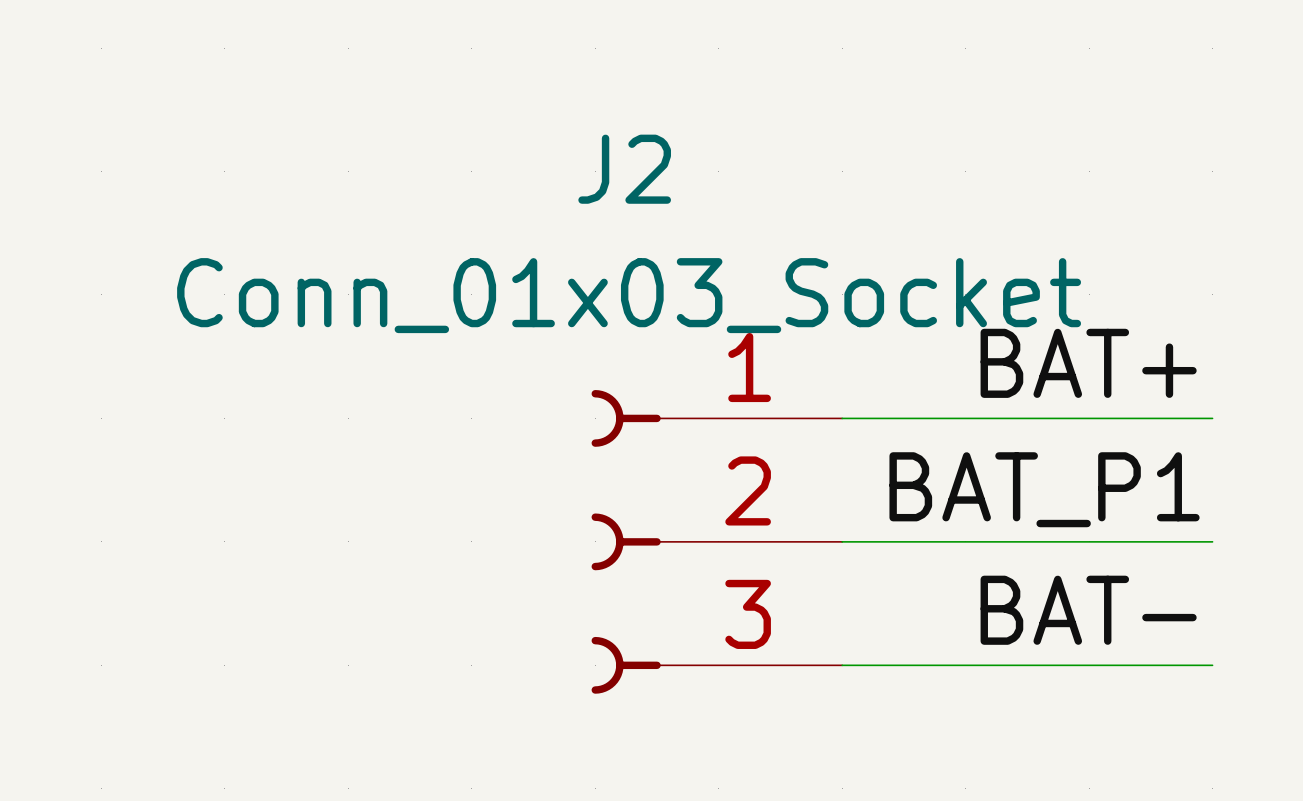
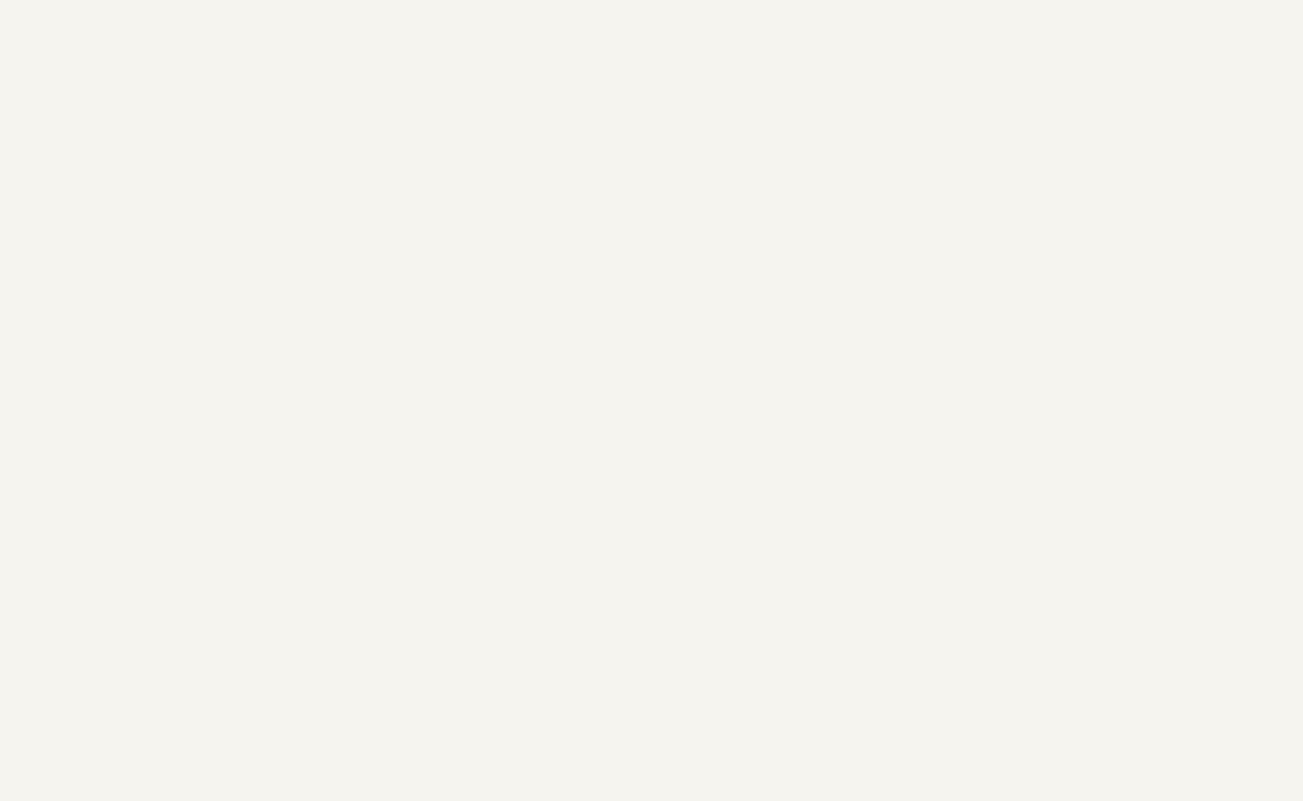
label: BAT+ (1088, 363) -> none
wire: (842, 418) (1212, 418) -> none
label: BAT_P1 (1044, 489) -> none
J2: Conn_01x03_Socket (716, 541) -> none
wire: (842, 541) (1212, 541) -> none
label: BAT- (1088, 610) -> none
wire: (842, 665) (1212, 665) -> none

